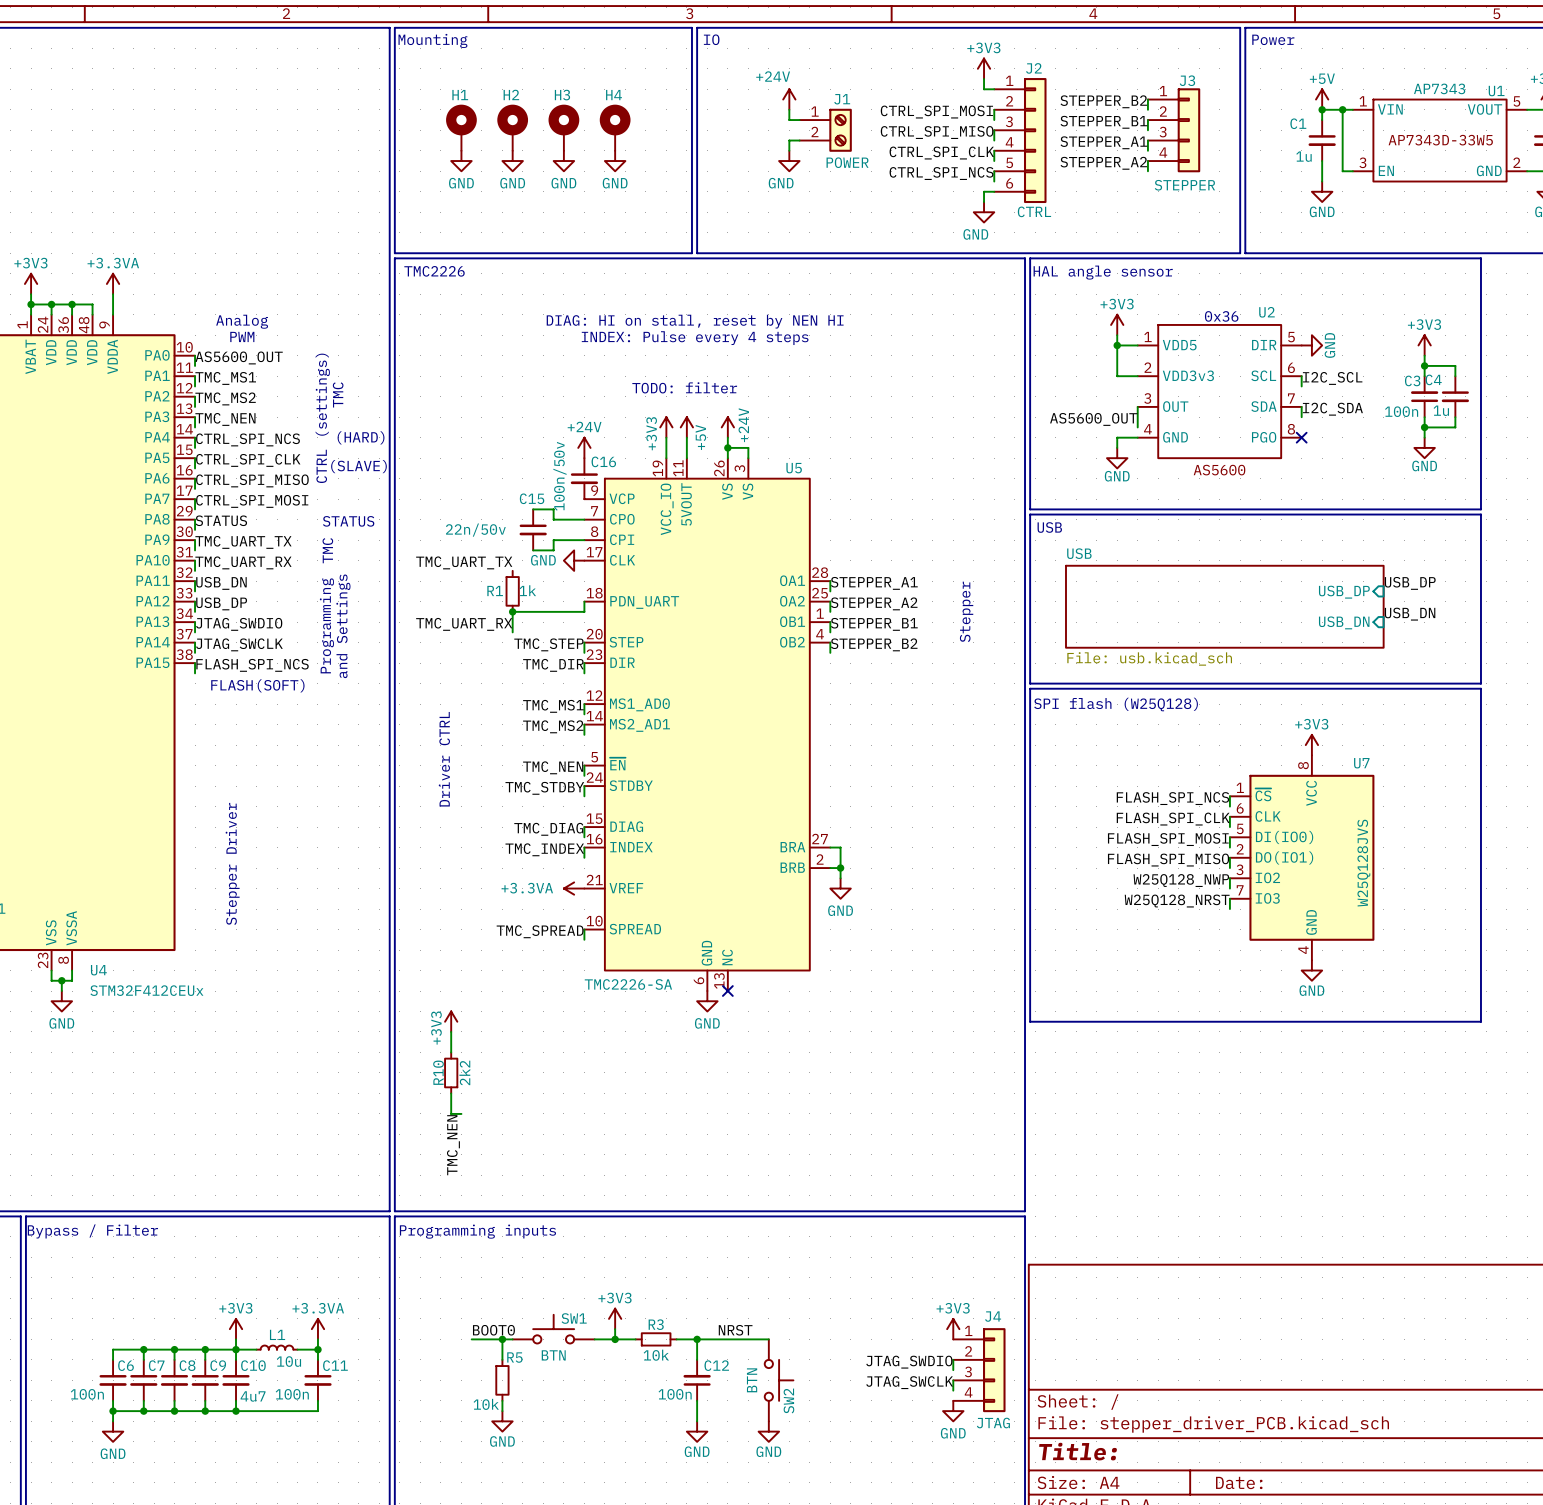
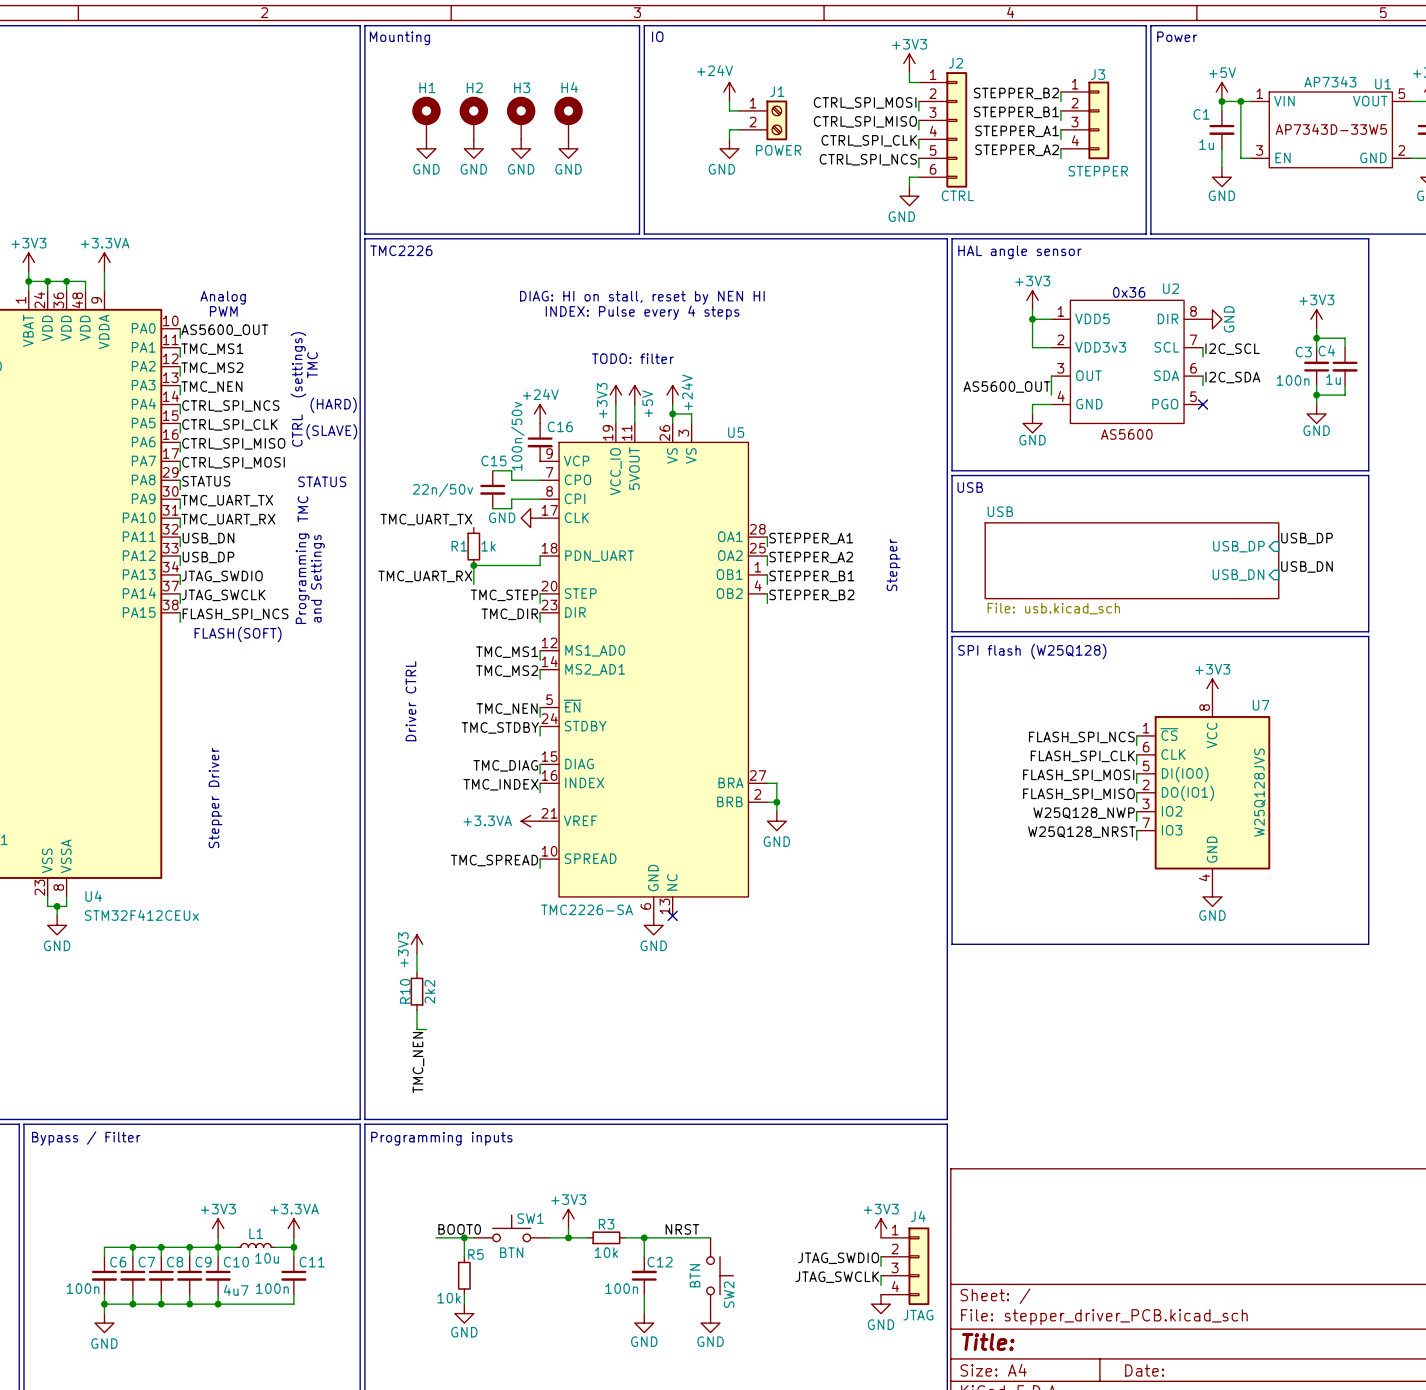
U2 pin number: 5 (1291, 337) -> 8 (1193, 311)
U2 pin number: 6 (1291, 367) -> 7 (1193, 339)
U2 pin number: 7 (1291, 398) -> 6 (1193, 368)
U2 pin number: 8 (1291, 429) -> 5 (1193, 396)

